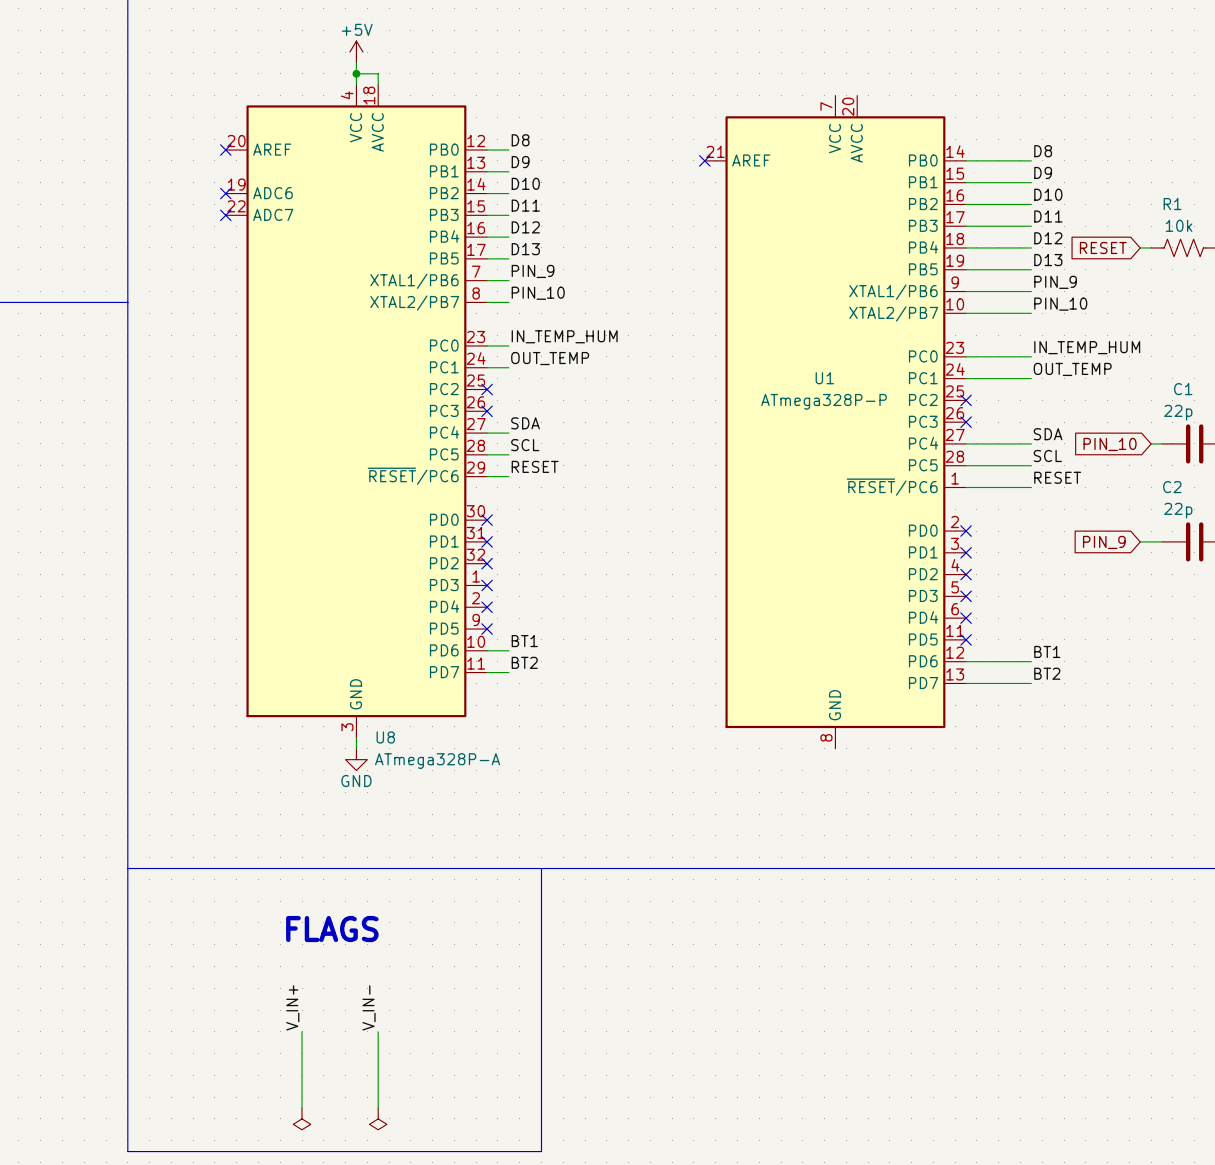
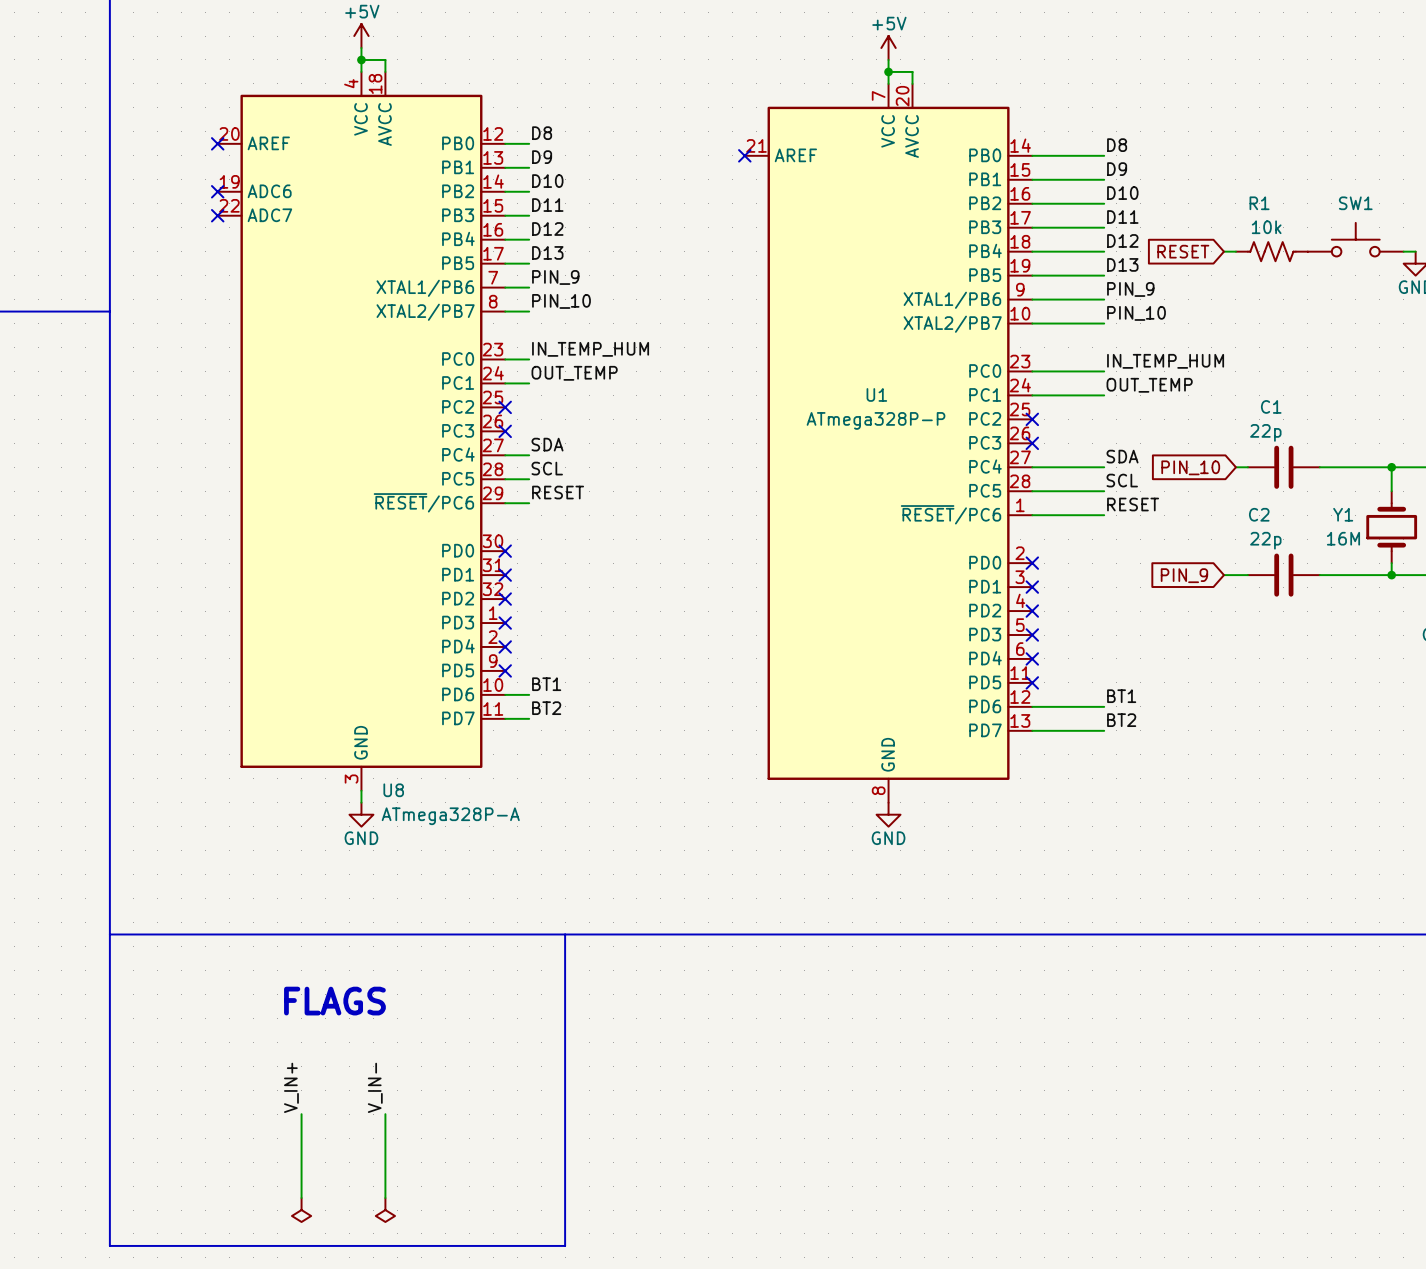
power symbol: none -> +5V (888, 48)
wire: none -> (888, 59) (888, 83)
wire: none -> (888, 71) (912, 71) (912, 83)
junction: none -> (888, 71)
power symbol: none -> GND (888, 814)

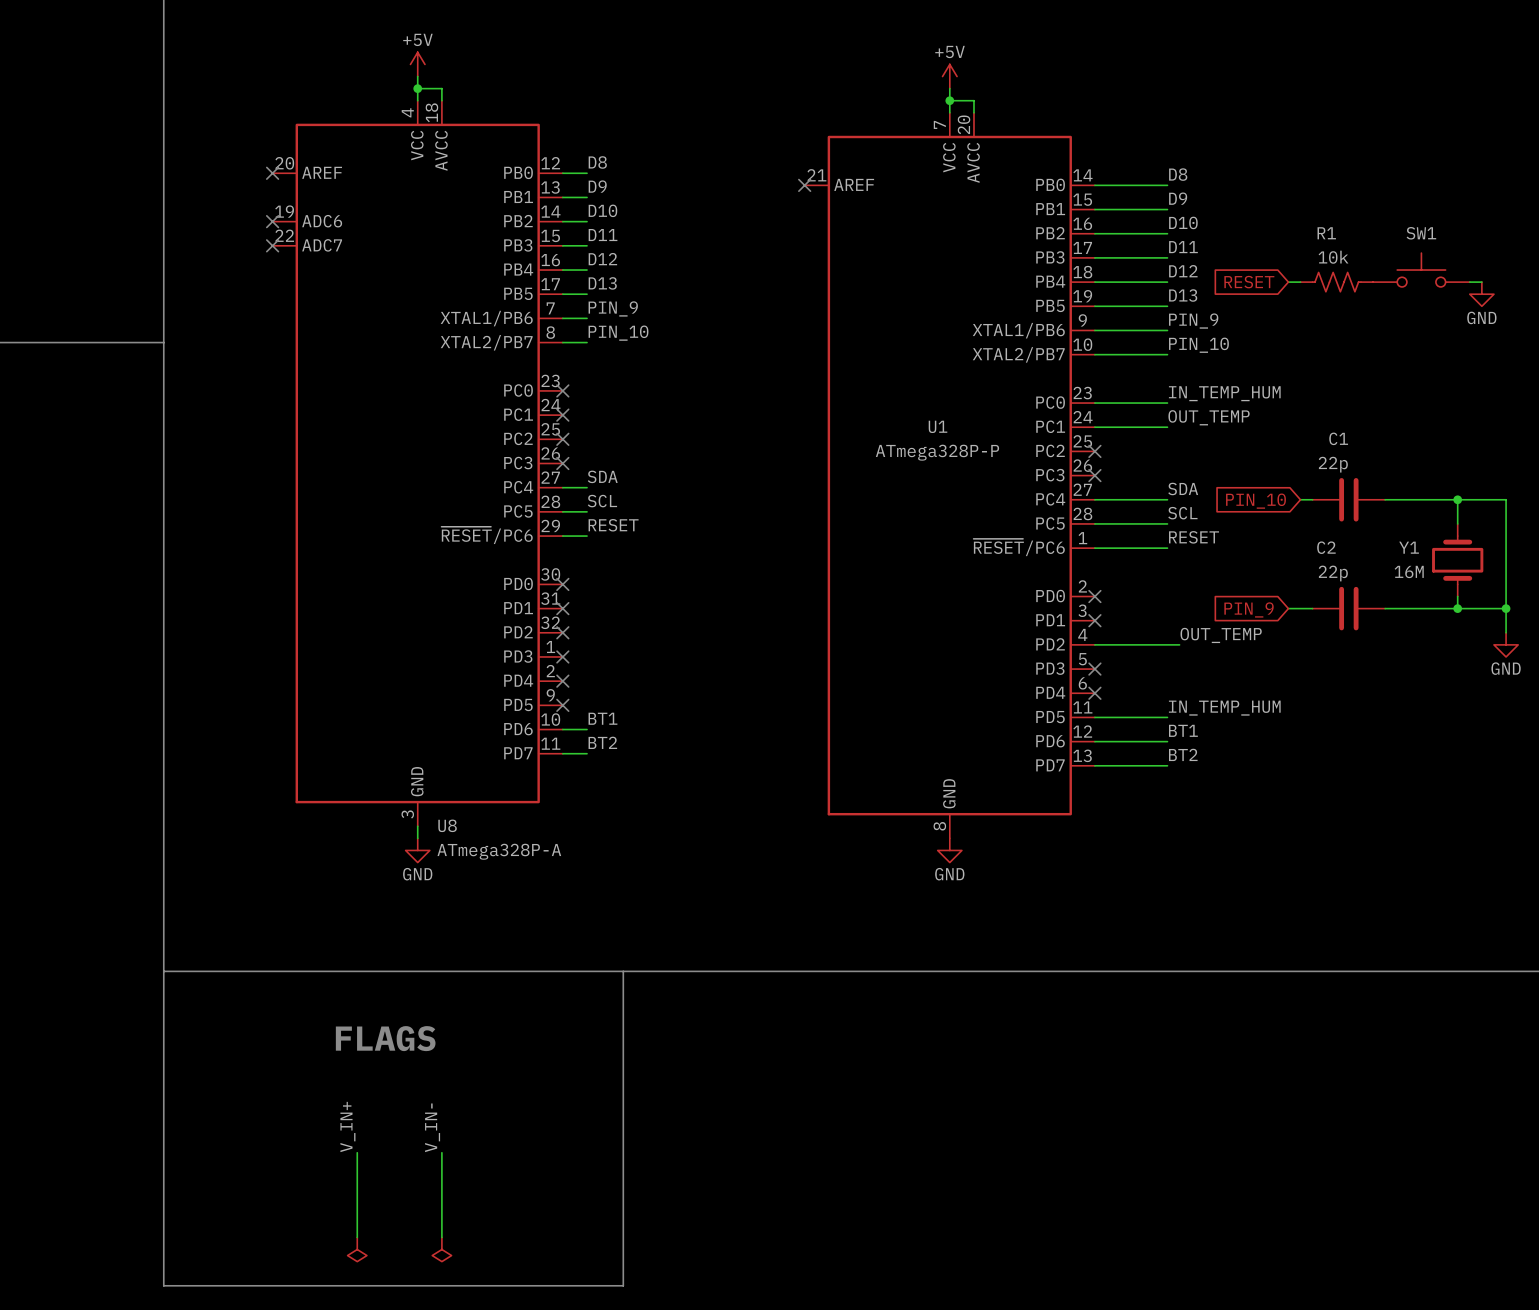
label: IN_TEMP_HUM (590, 349) -> none
wire: (505, 359) (529, 359) -> none
no-connect mark: none -> (562, 390)
label: OUT_TEMP (574, 373) -> none
wire: (505, 383) (529, 383) -> none
no-connect mark: none -> (562, 415)
label: none -> OUT_TEMP (1221, 635)
wire: none -> (1094, 644) (1179, 644)
no-connect mark: (1032, 611) -> none
label: none -> IN_TEMP_HUM (1224, 708)
wire: none -> (1094, 717) (1167, 717)
no-connect mark: (1032, 682) -> none

